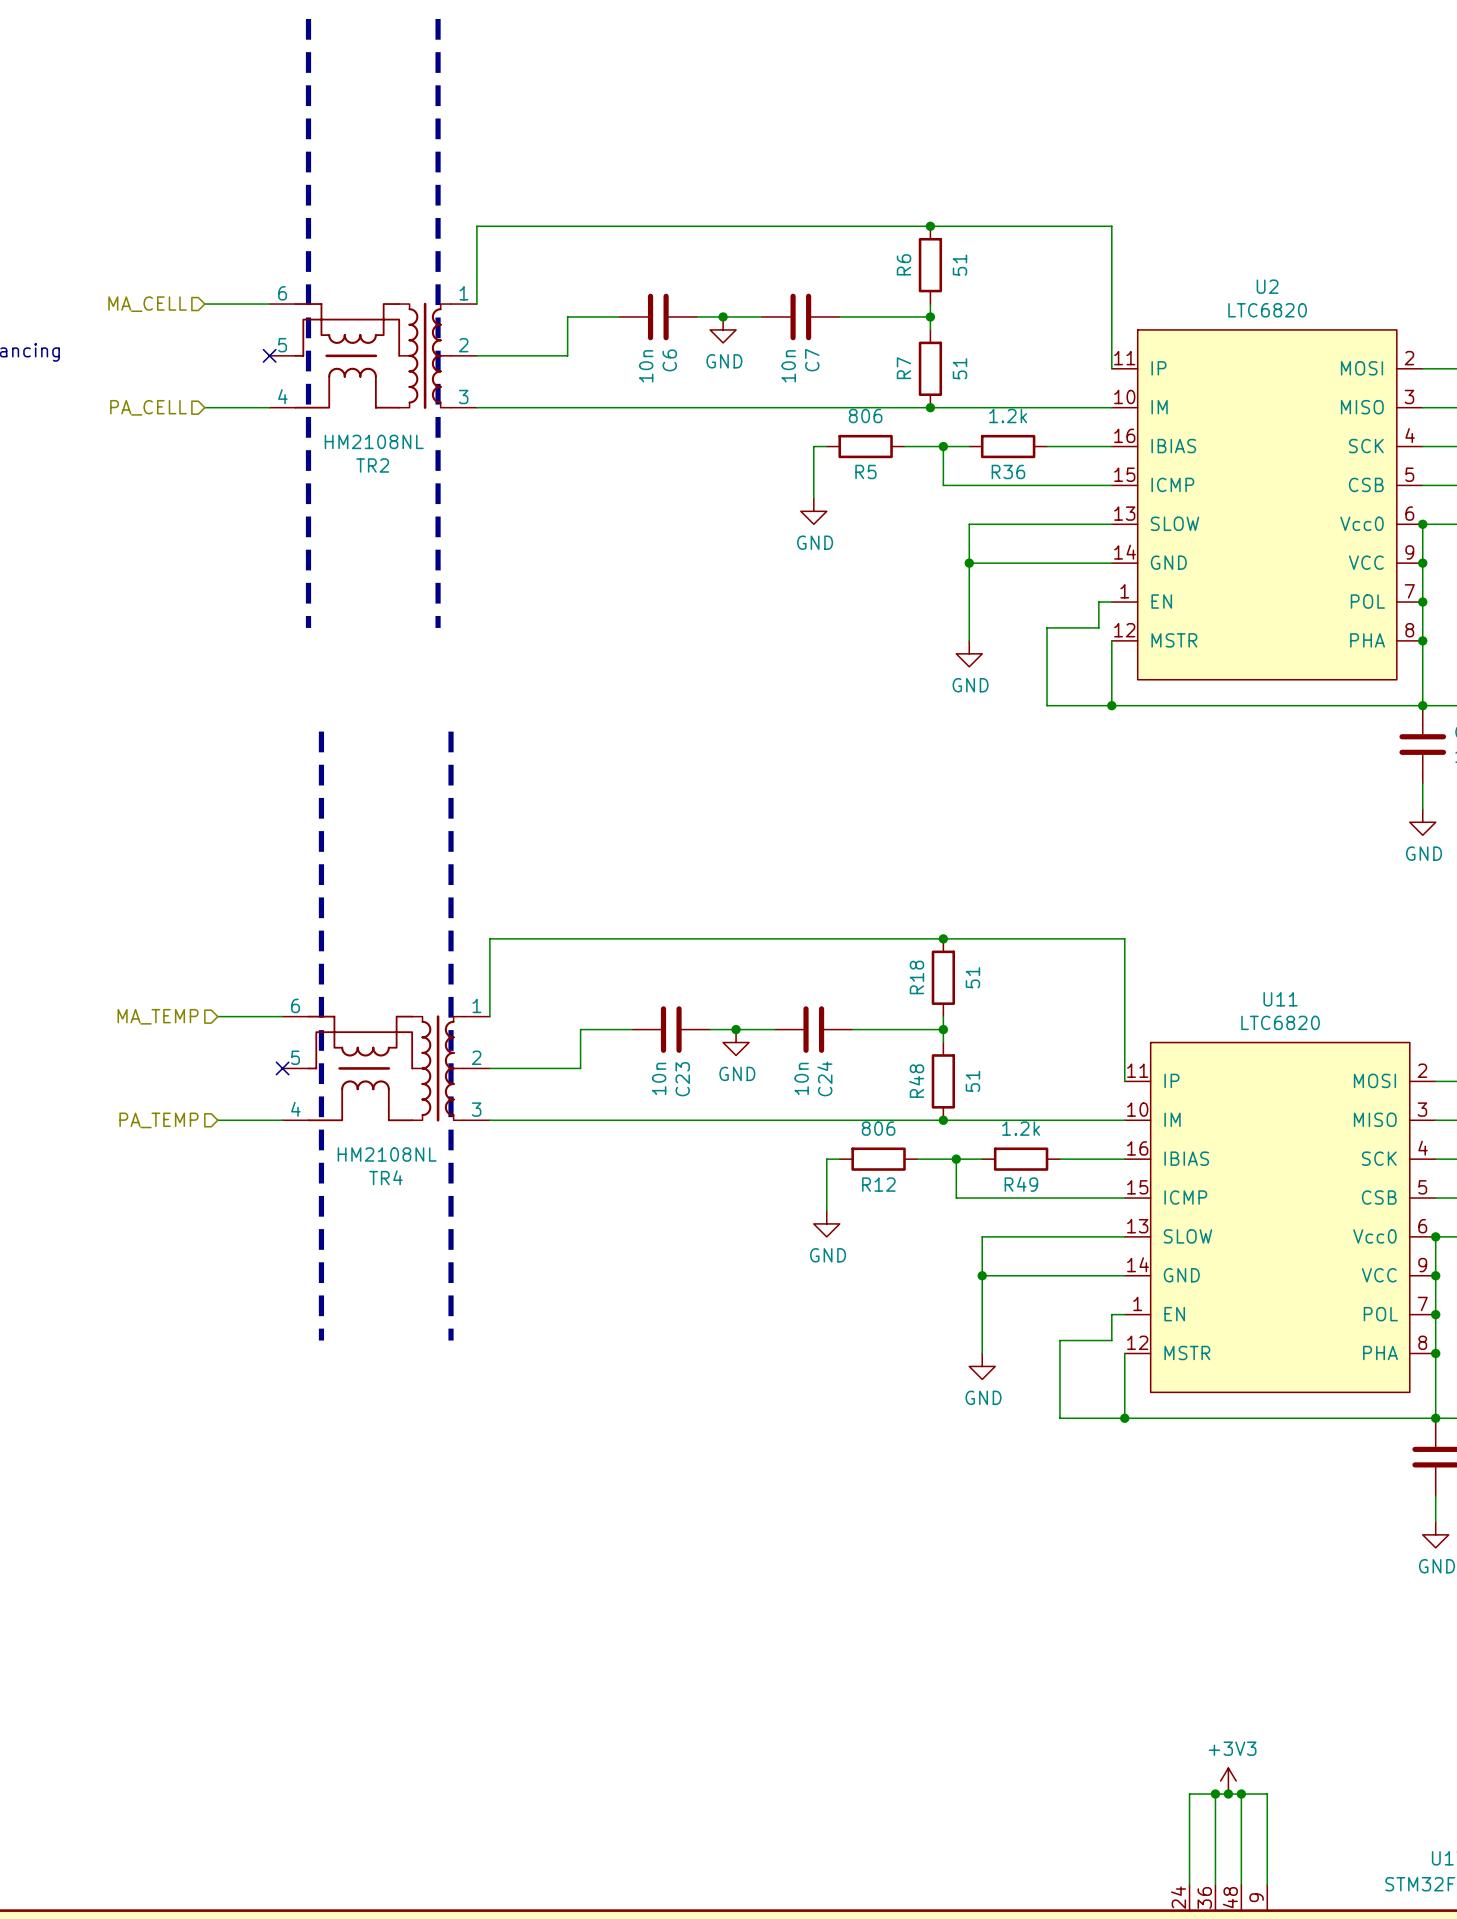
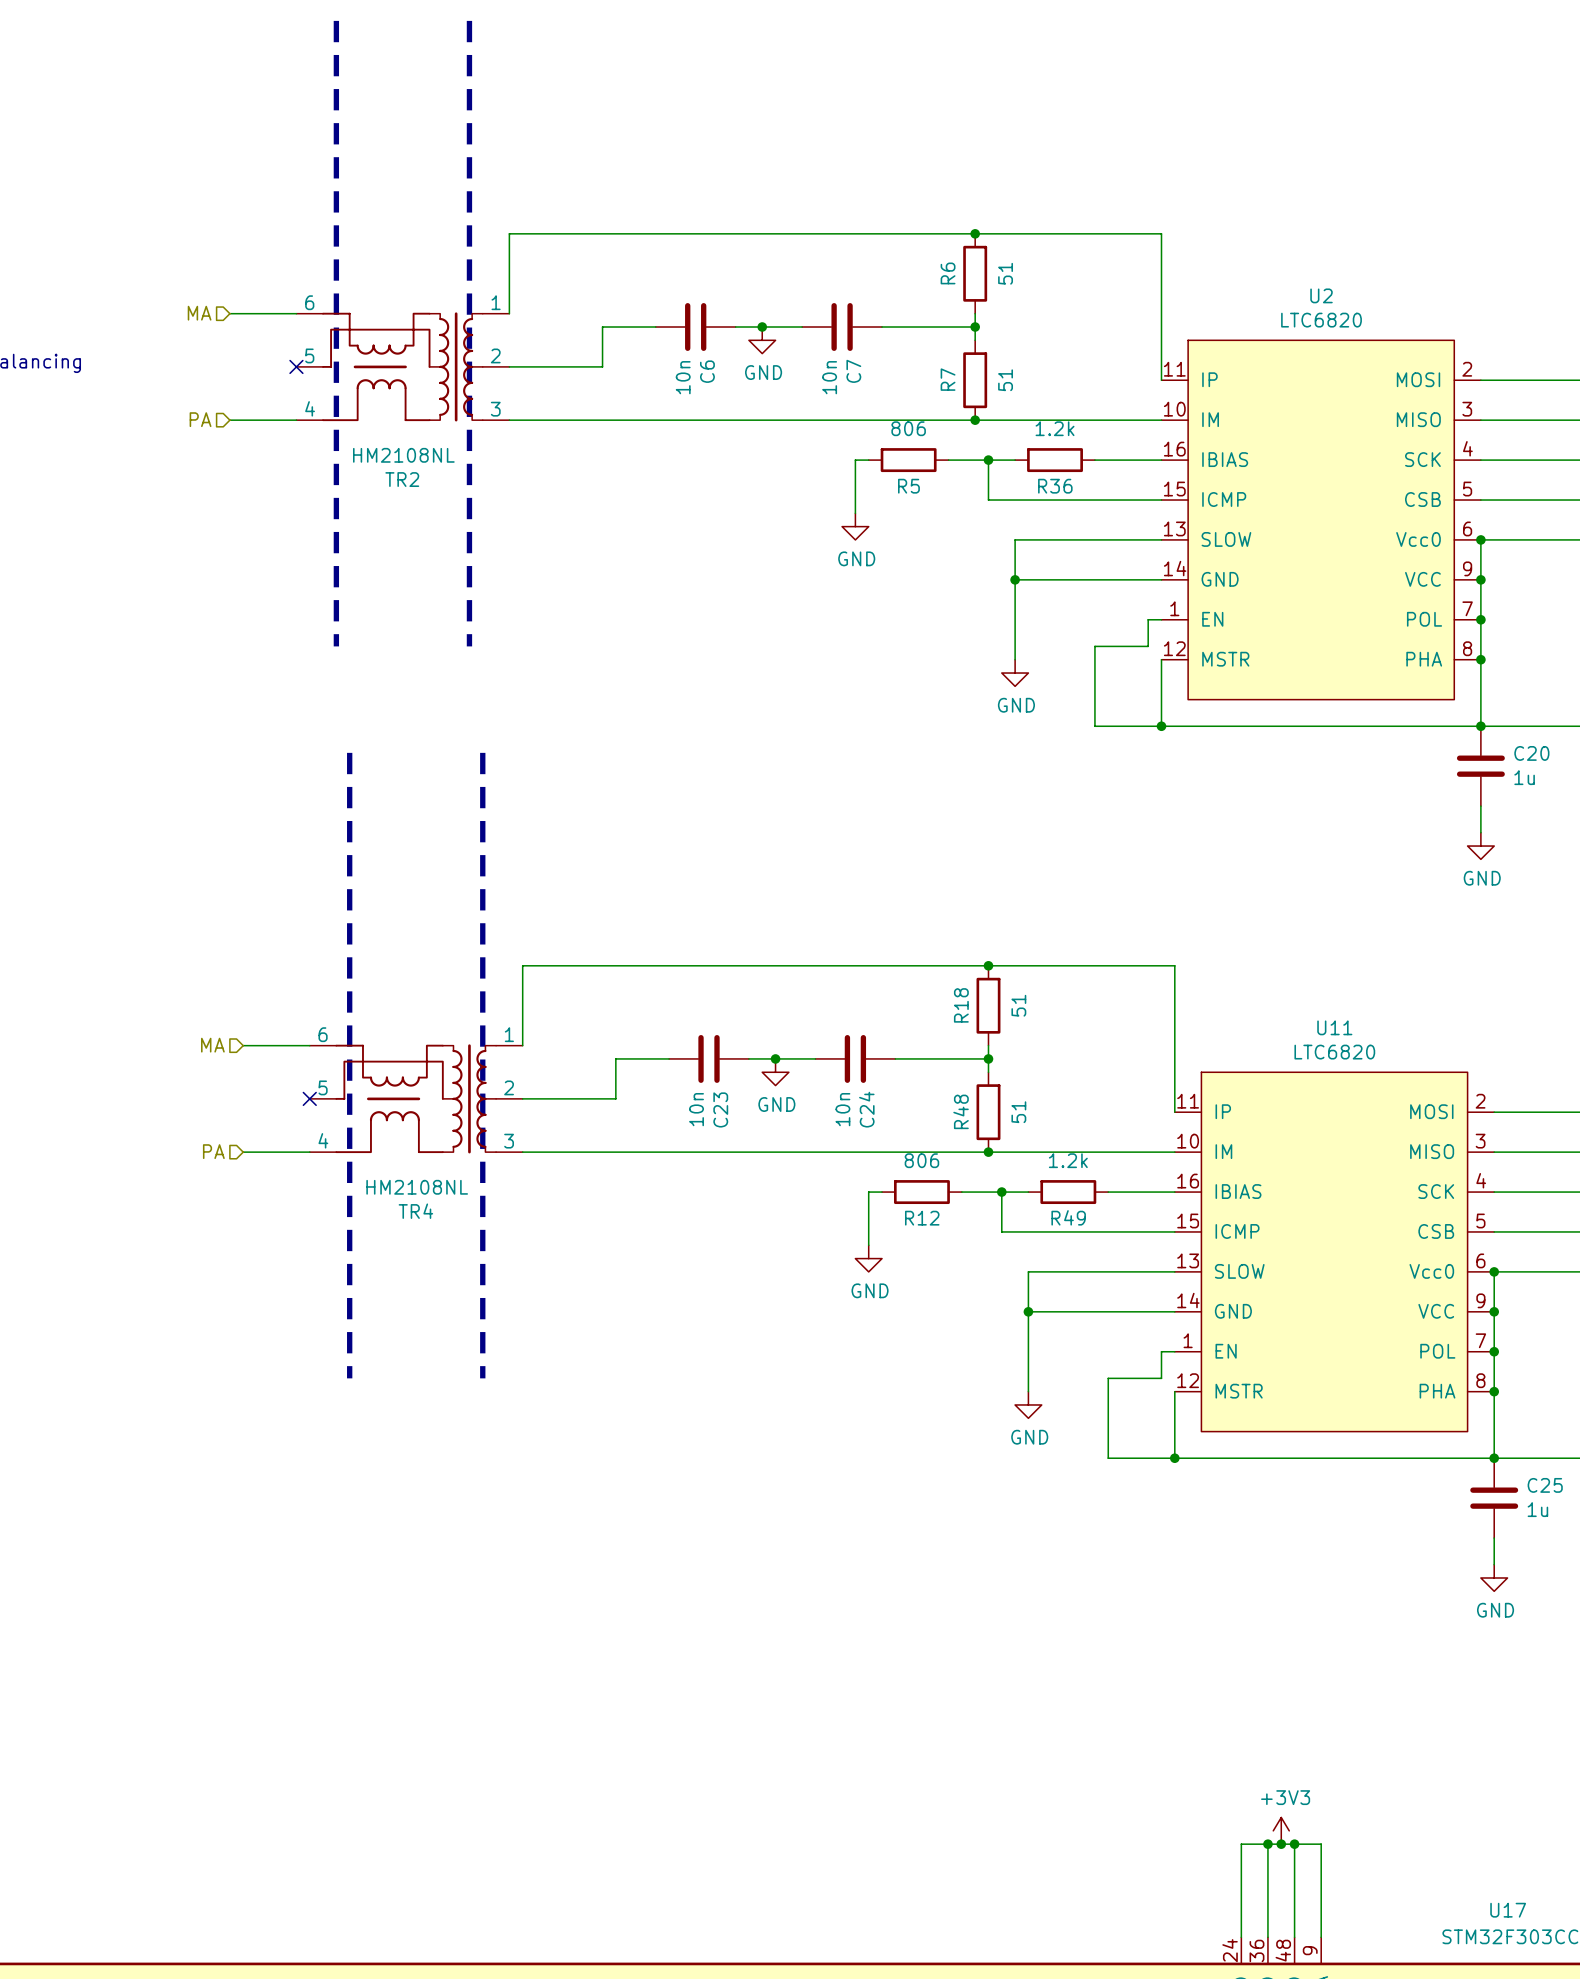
hierarchical label: MA_CELL (147, 304) -> MA (199, 313)
hierarchical label: PA_CELL (148, 407) -> PA (200, 419)
hierarchical label: MA_TEMP (158, 1016) -> MA (212, 1045)
hierarchical label: PA_TEMP (158, 1120) -> PA (213, 1151)

